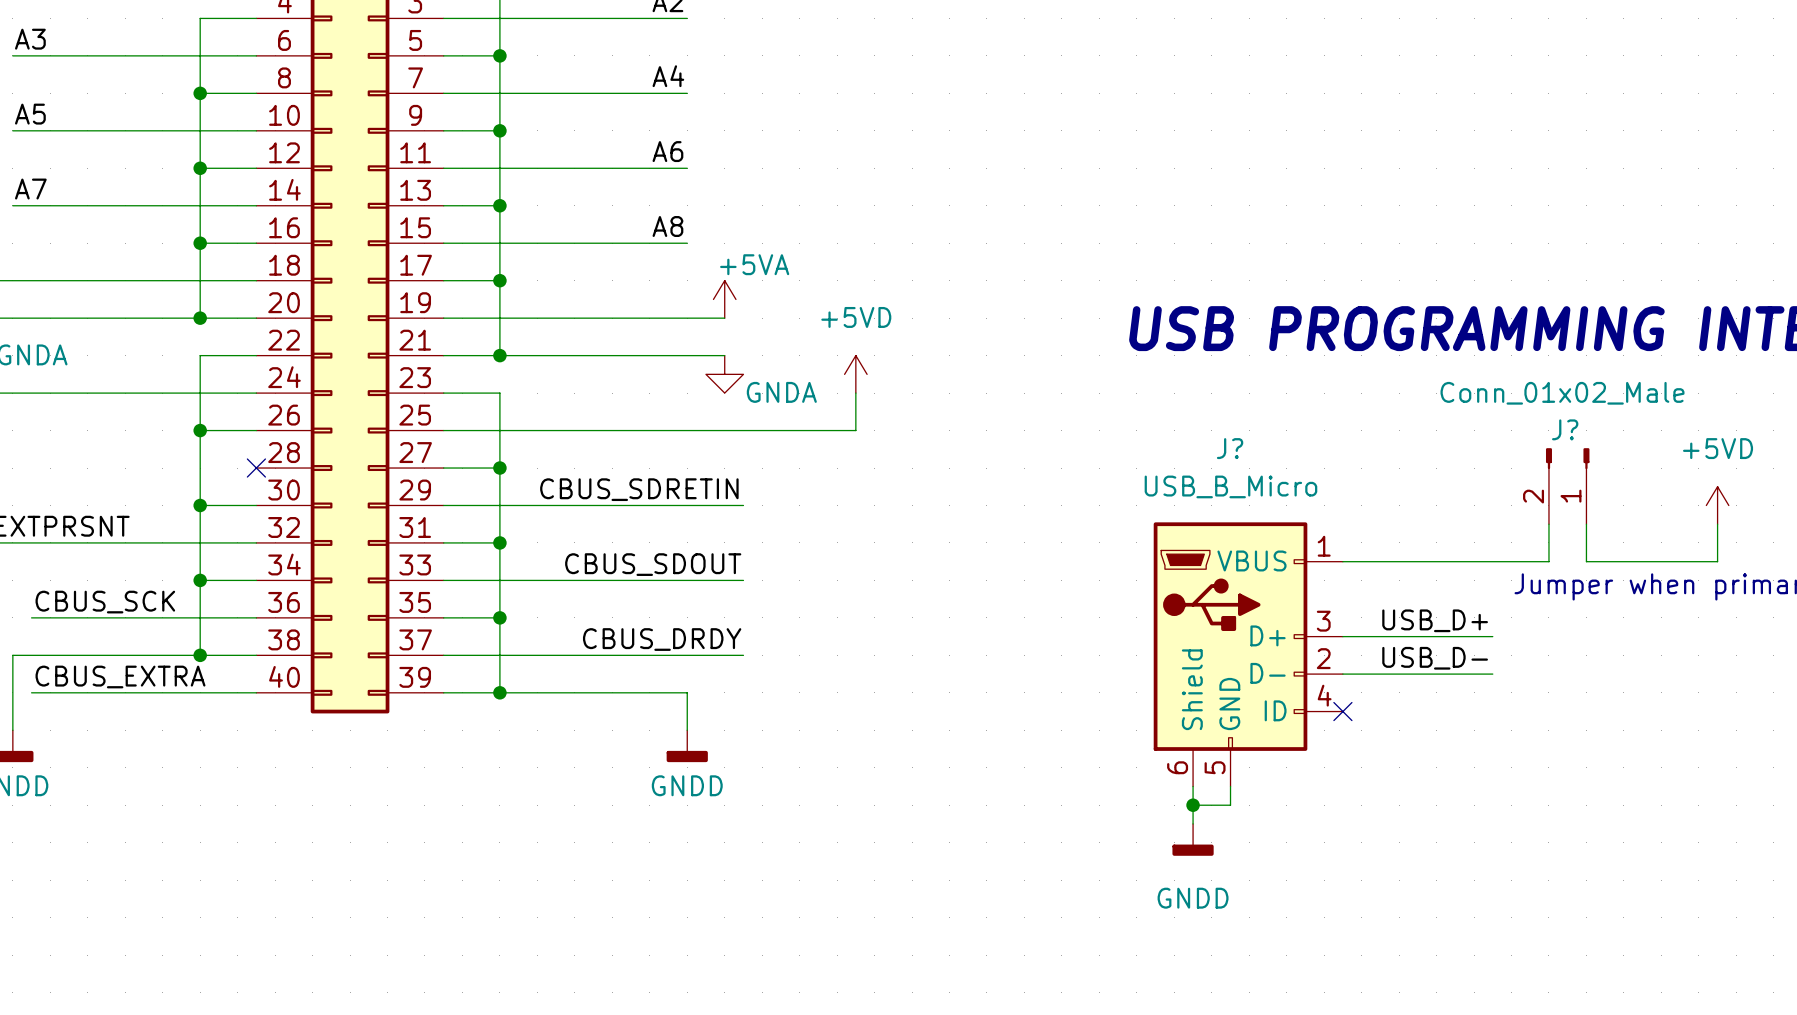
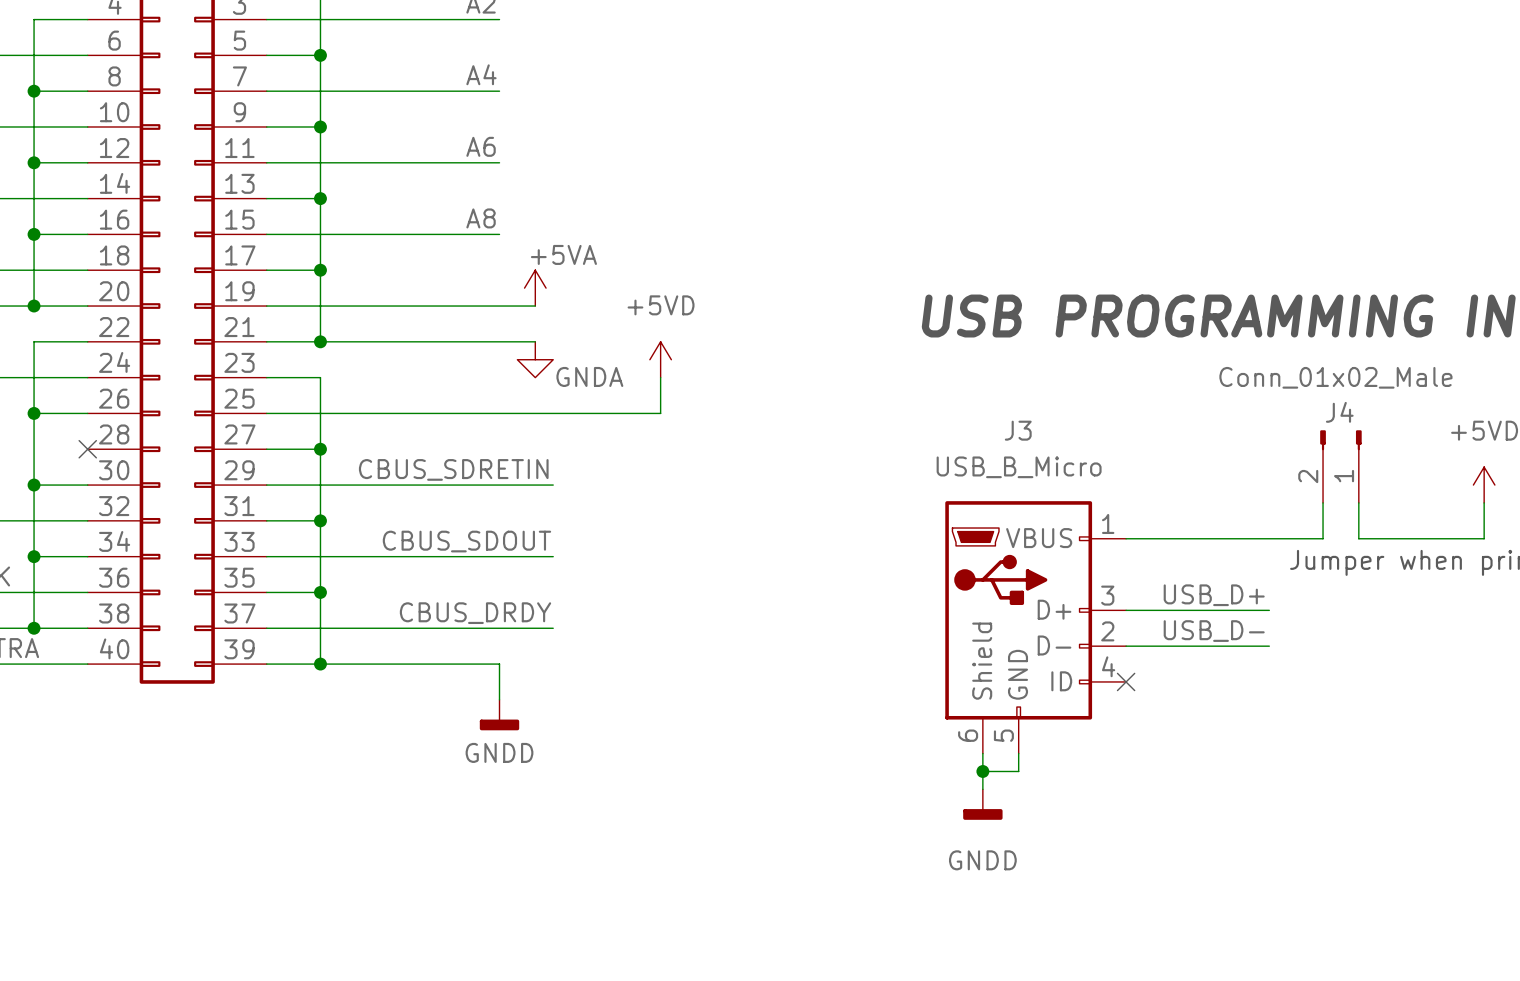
J? name: J? (1565, 429) -> J4 (1339, 412)
J? name: J? (1230, 448) -> J3 (1018, 430)

